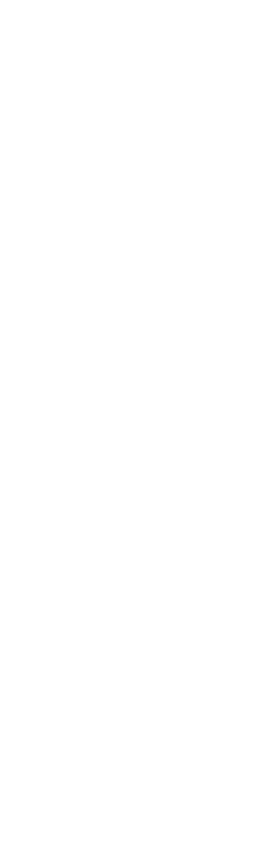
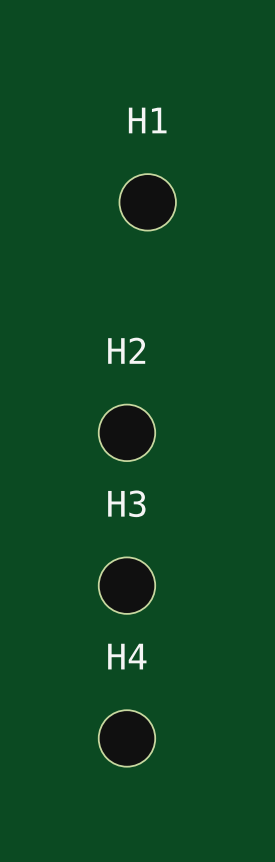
H1: none -> (147, 202)
H2: none -> (126, 432)
H3: none -> (126, 585)
H4: none -> (126, 738)

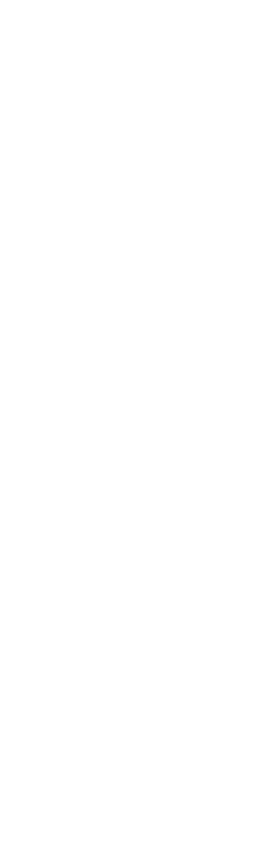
H1: (147, 202) -> none
H2: (126, 432) -> none
H3: (126, 585) -> none
H4: (126, 738) -> none

